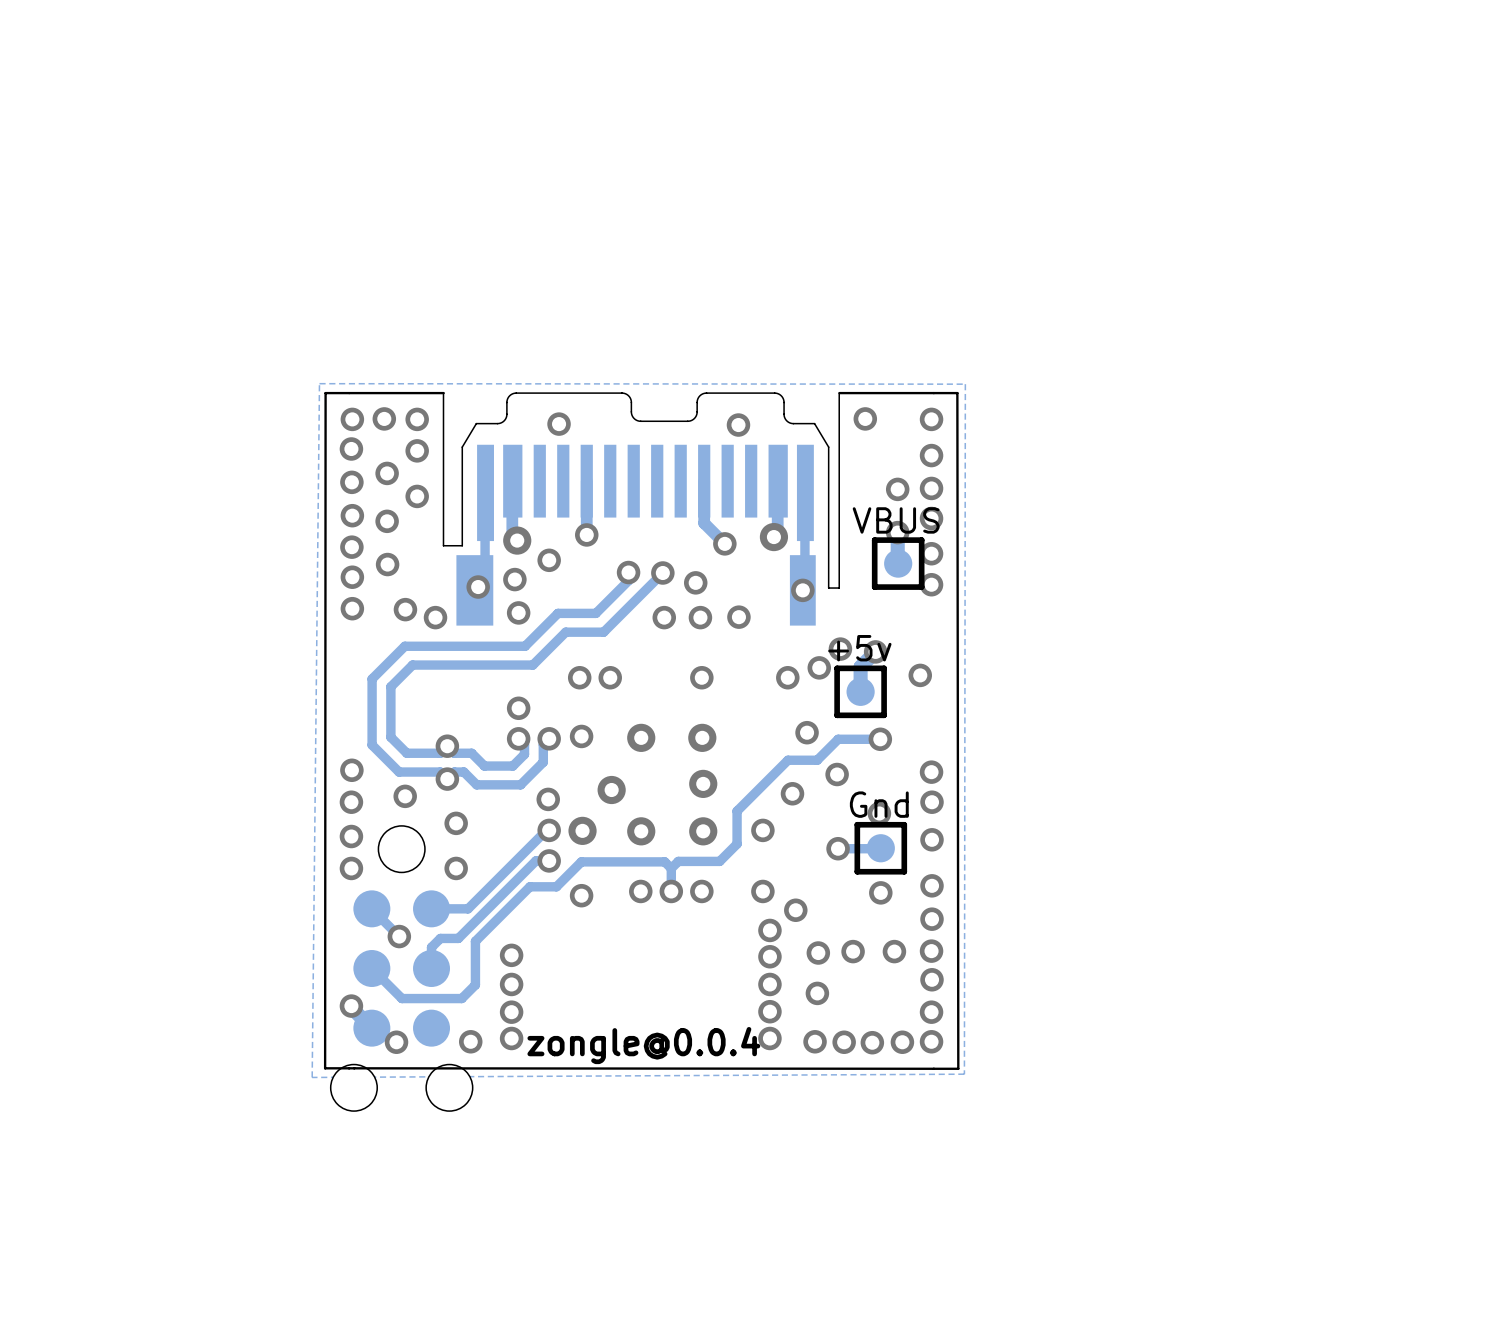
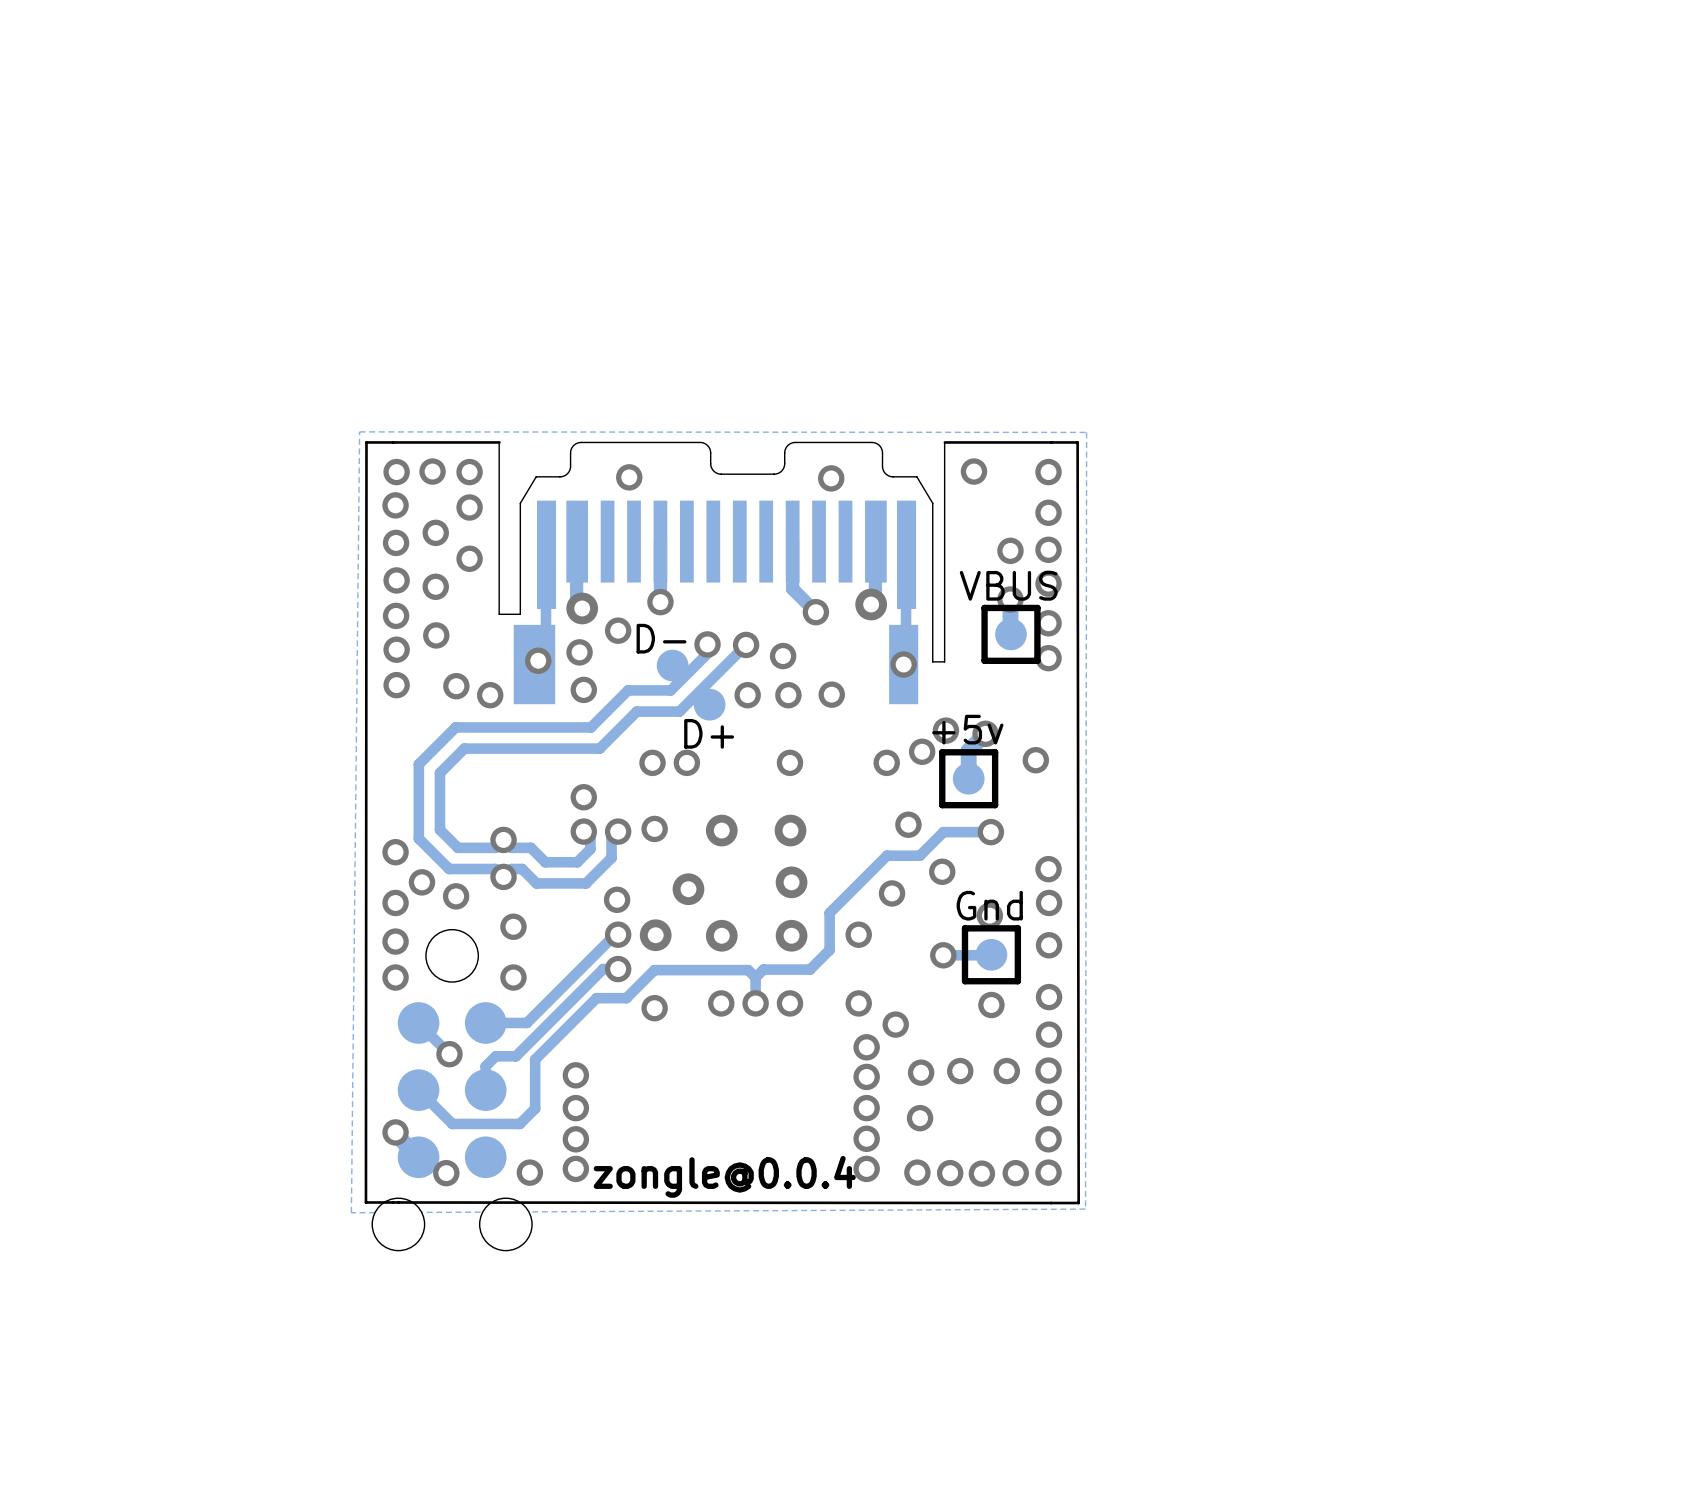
part: none -> D- (672, 665)
part: none -> D+ (709, 704)
via: none -> (395, 852)
via: (351, 770) -> none
via: none -> (422, 882)

